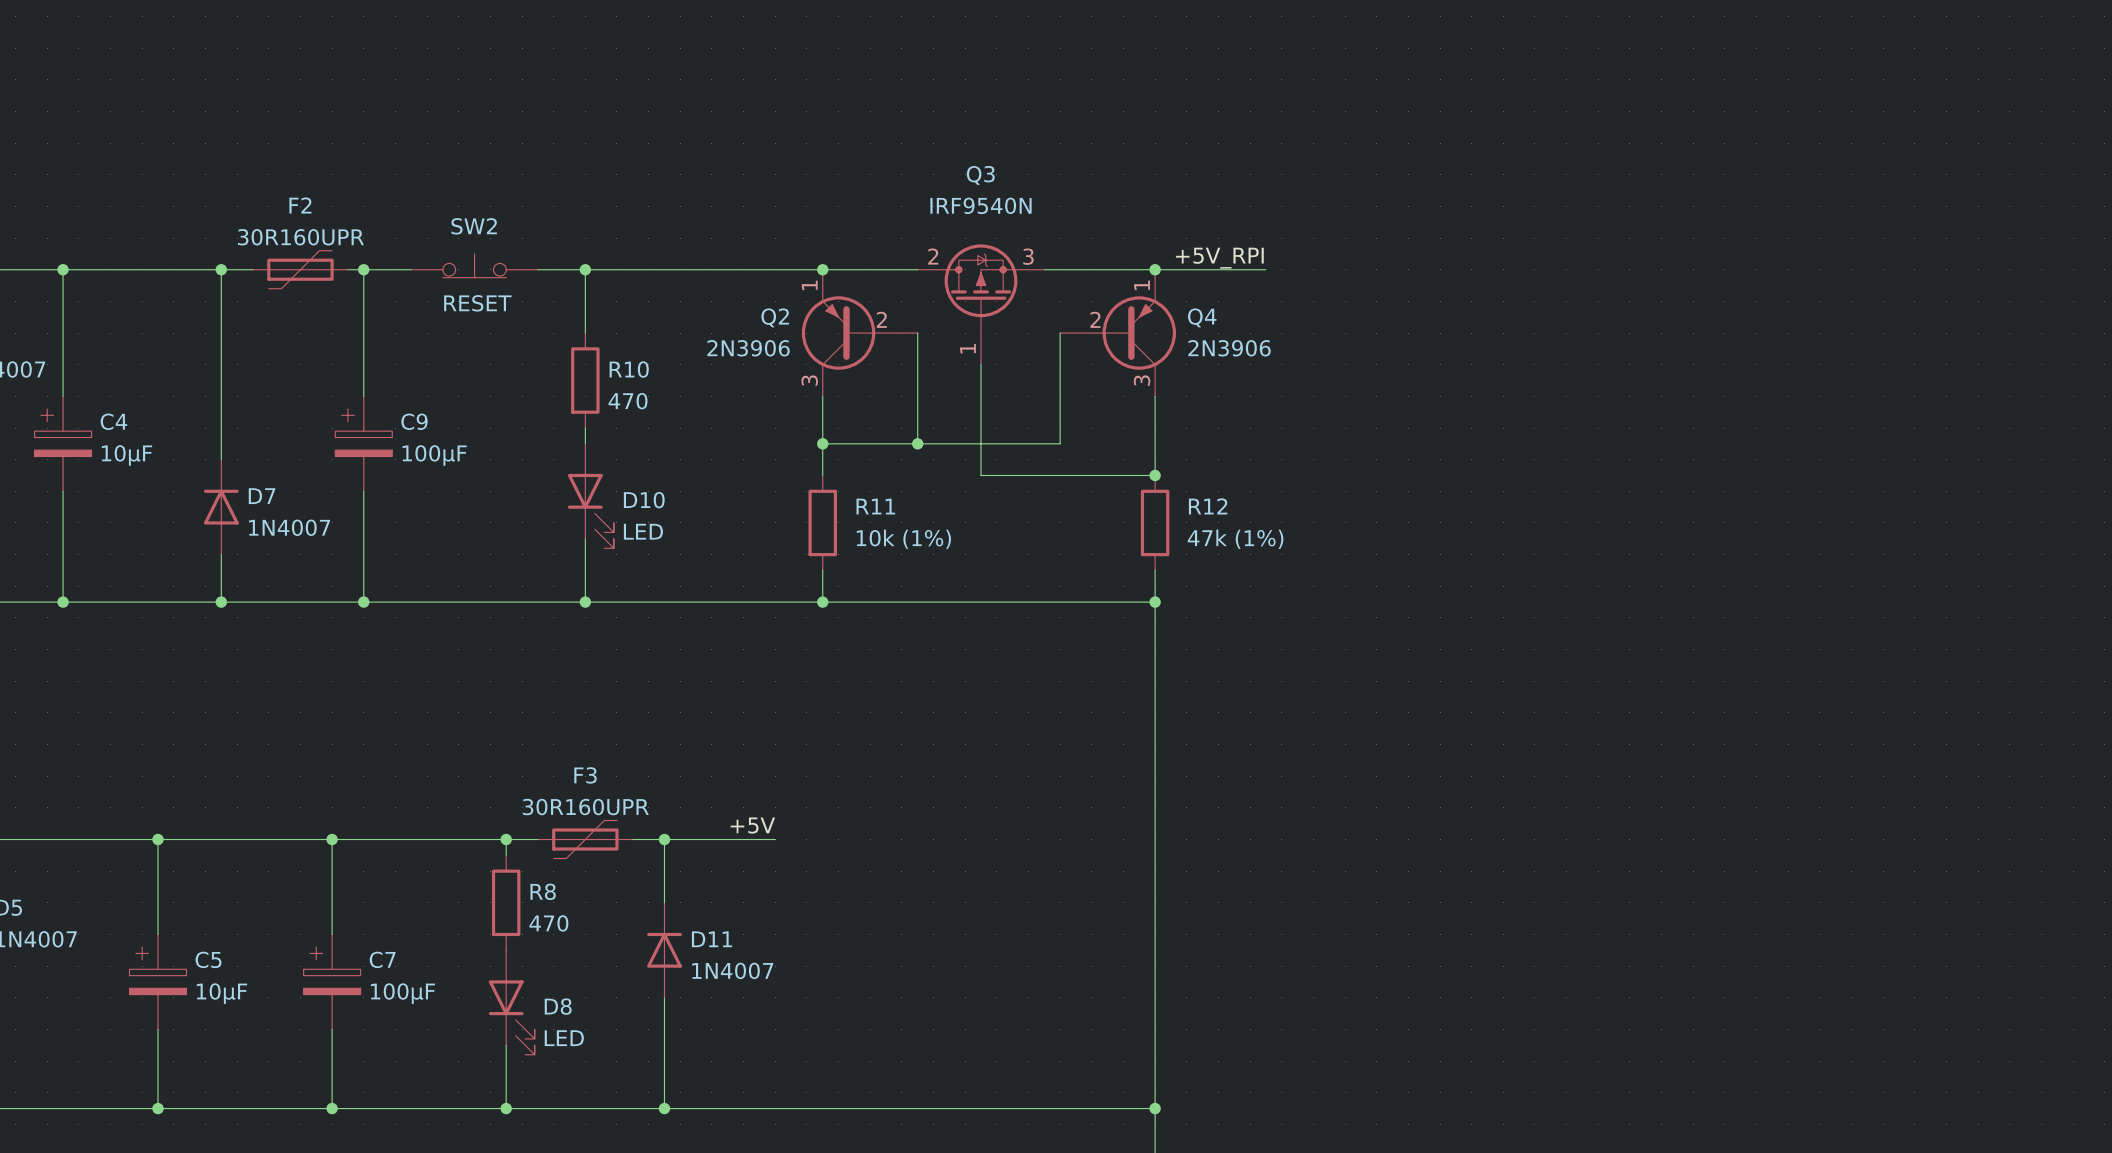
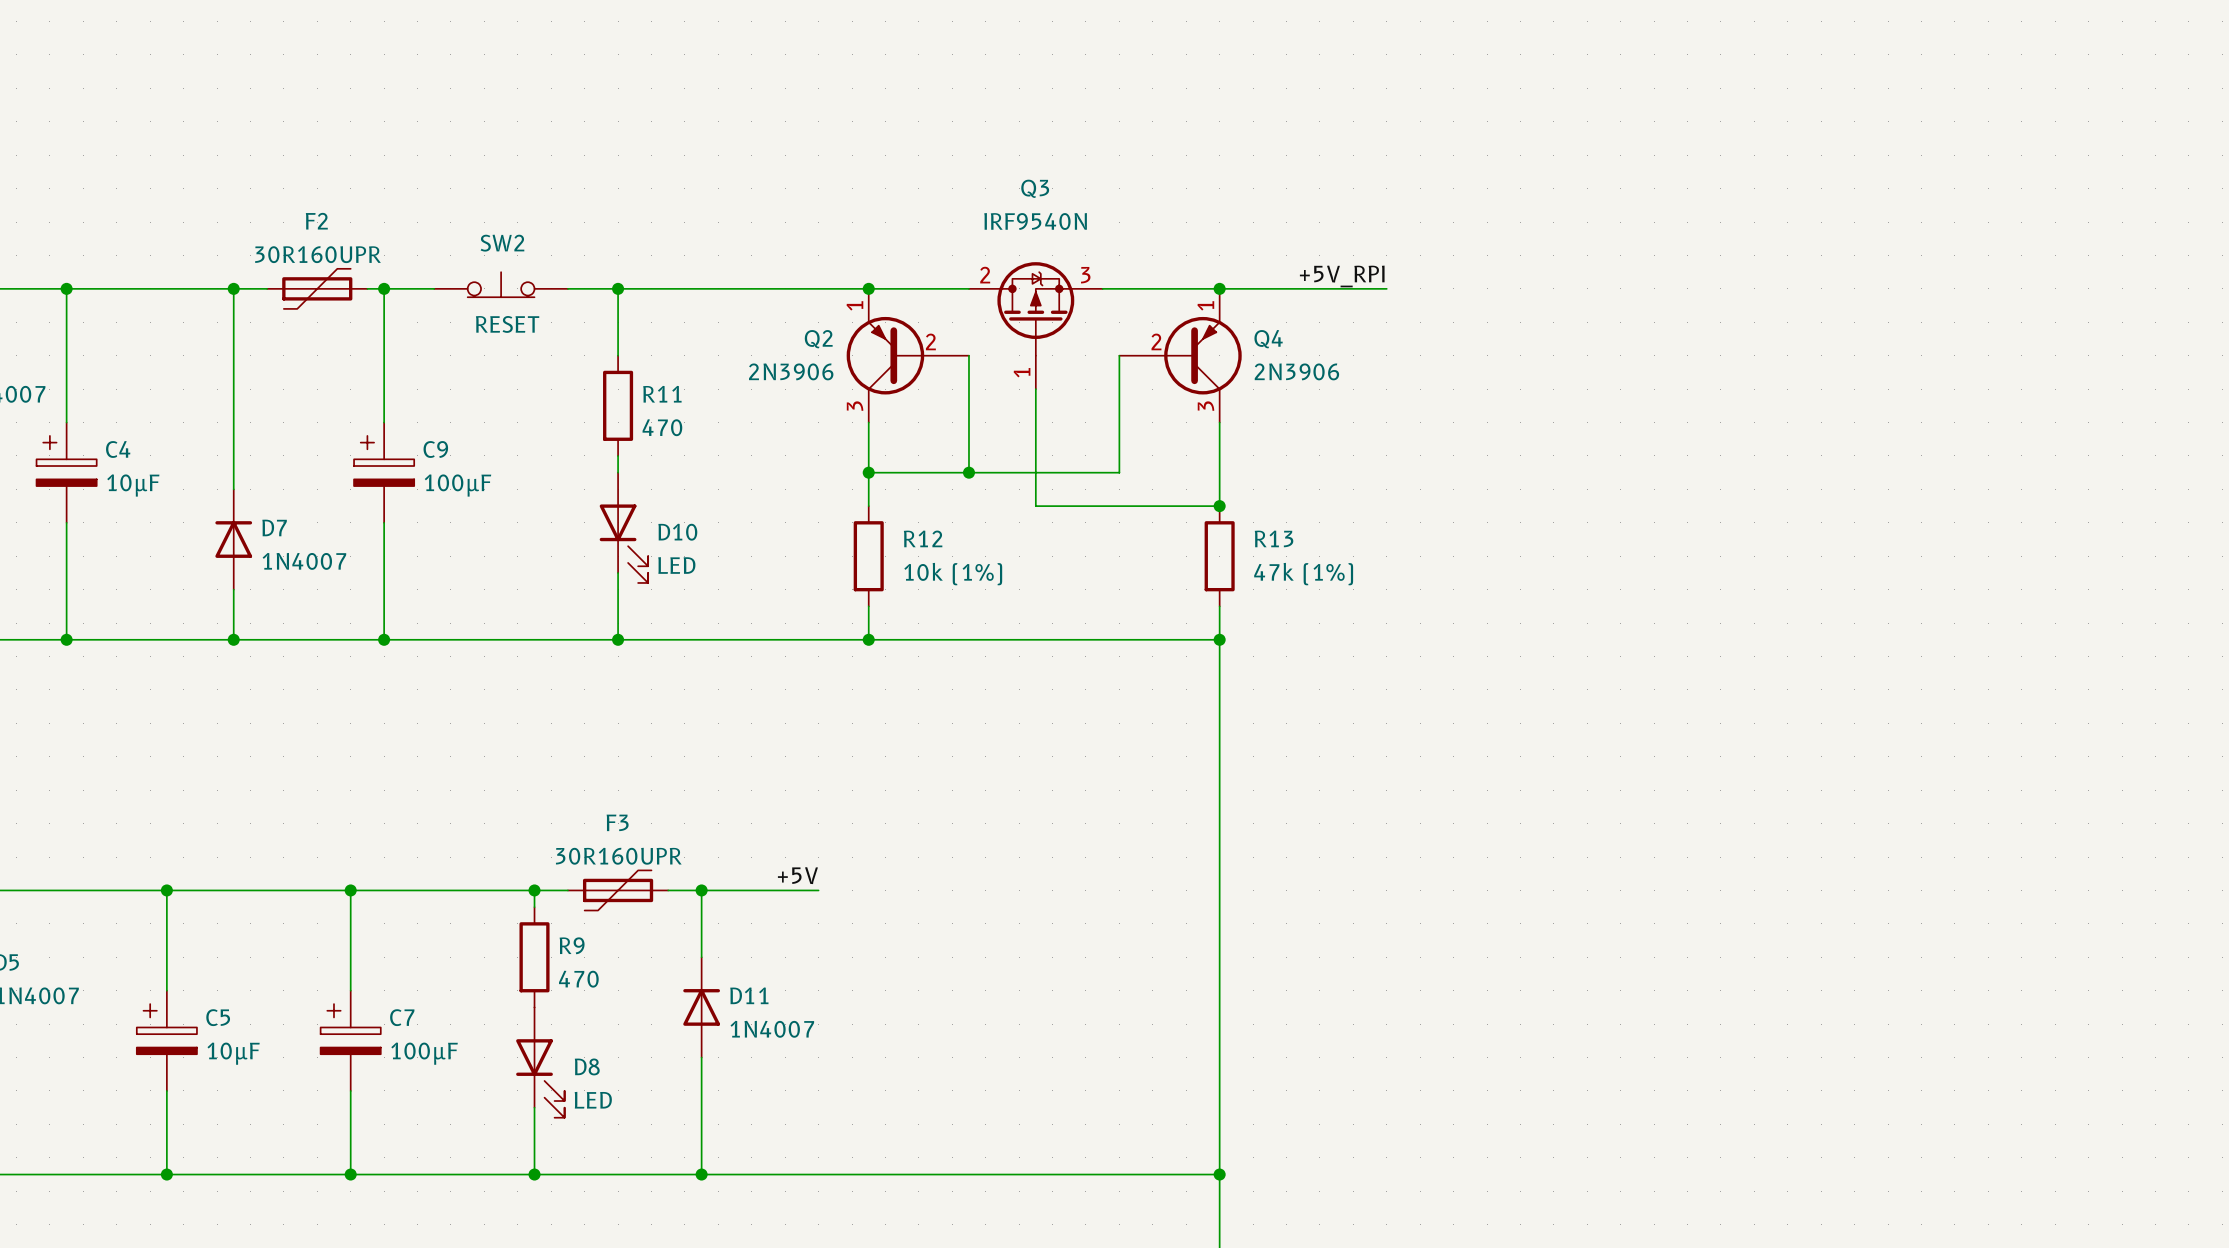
label position: +5V_RPI (1219, 258) -> +5V_RPI (1342, 276)
wire: none -> (1336, 288) (1386, 288)
R10 name: R10 (629, 369) -> R11 (662, 394)
R11 name: R11 (875, 506) -> R12 (923, 538)
R12 name: R12 (1208, 506) -> R13 (1274, 538)
R8 name: R8 (543, 891) -> R9 (572, 945)

